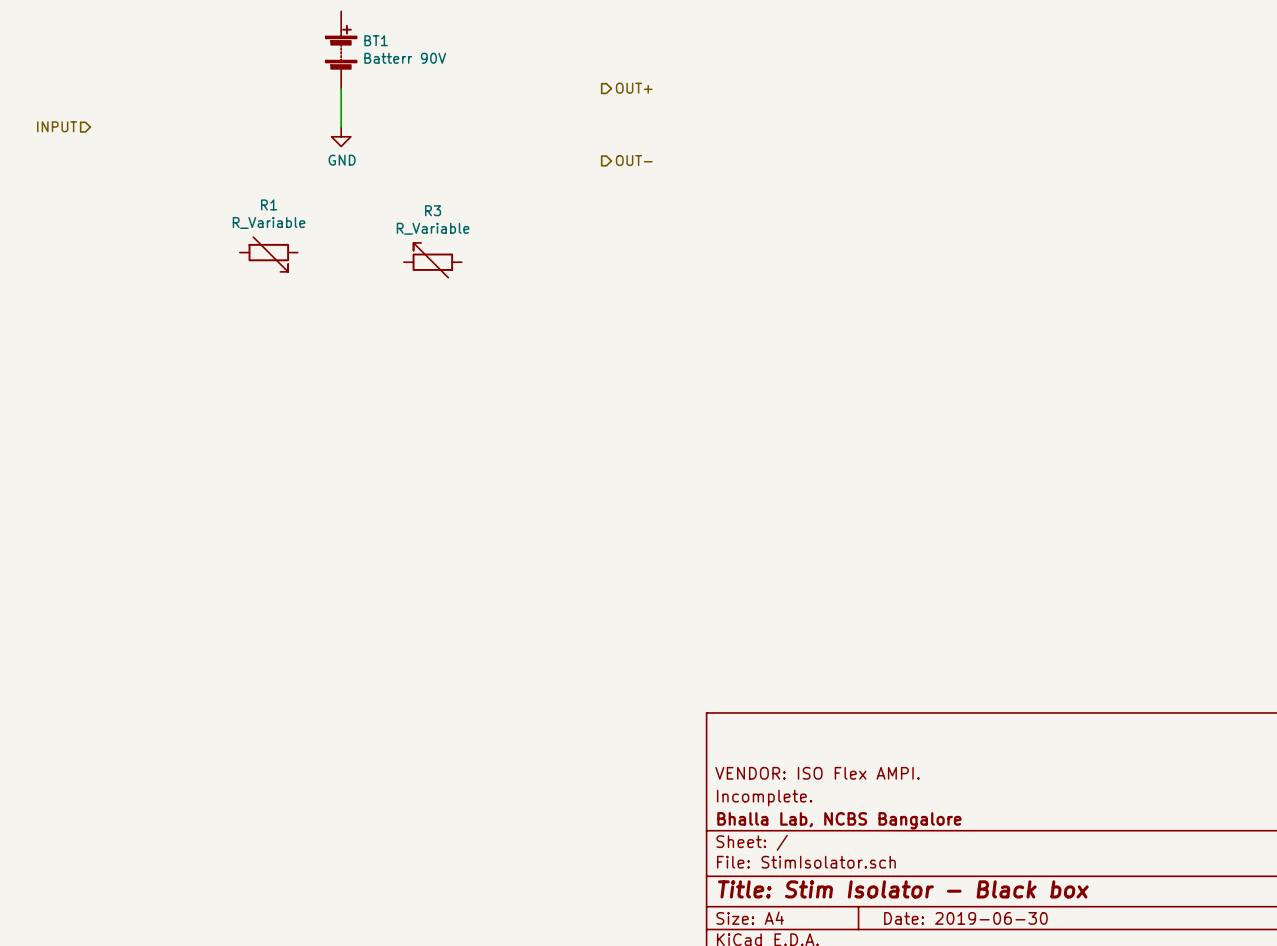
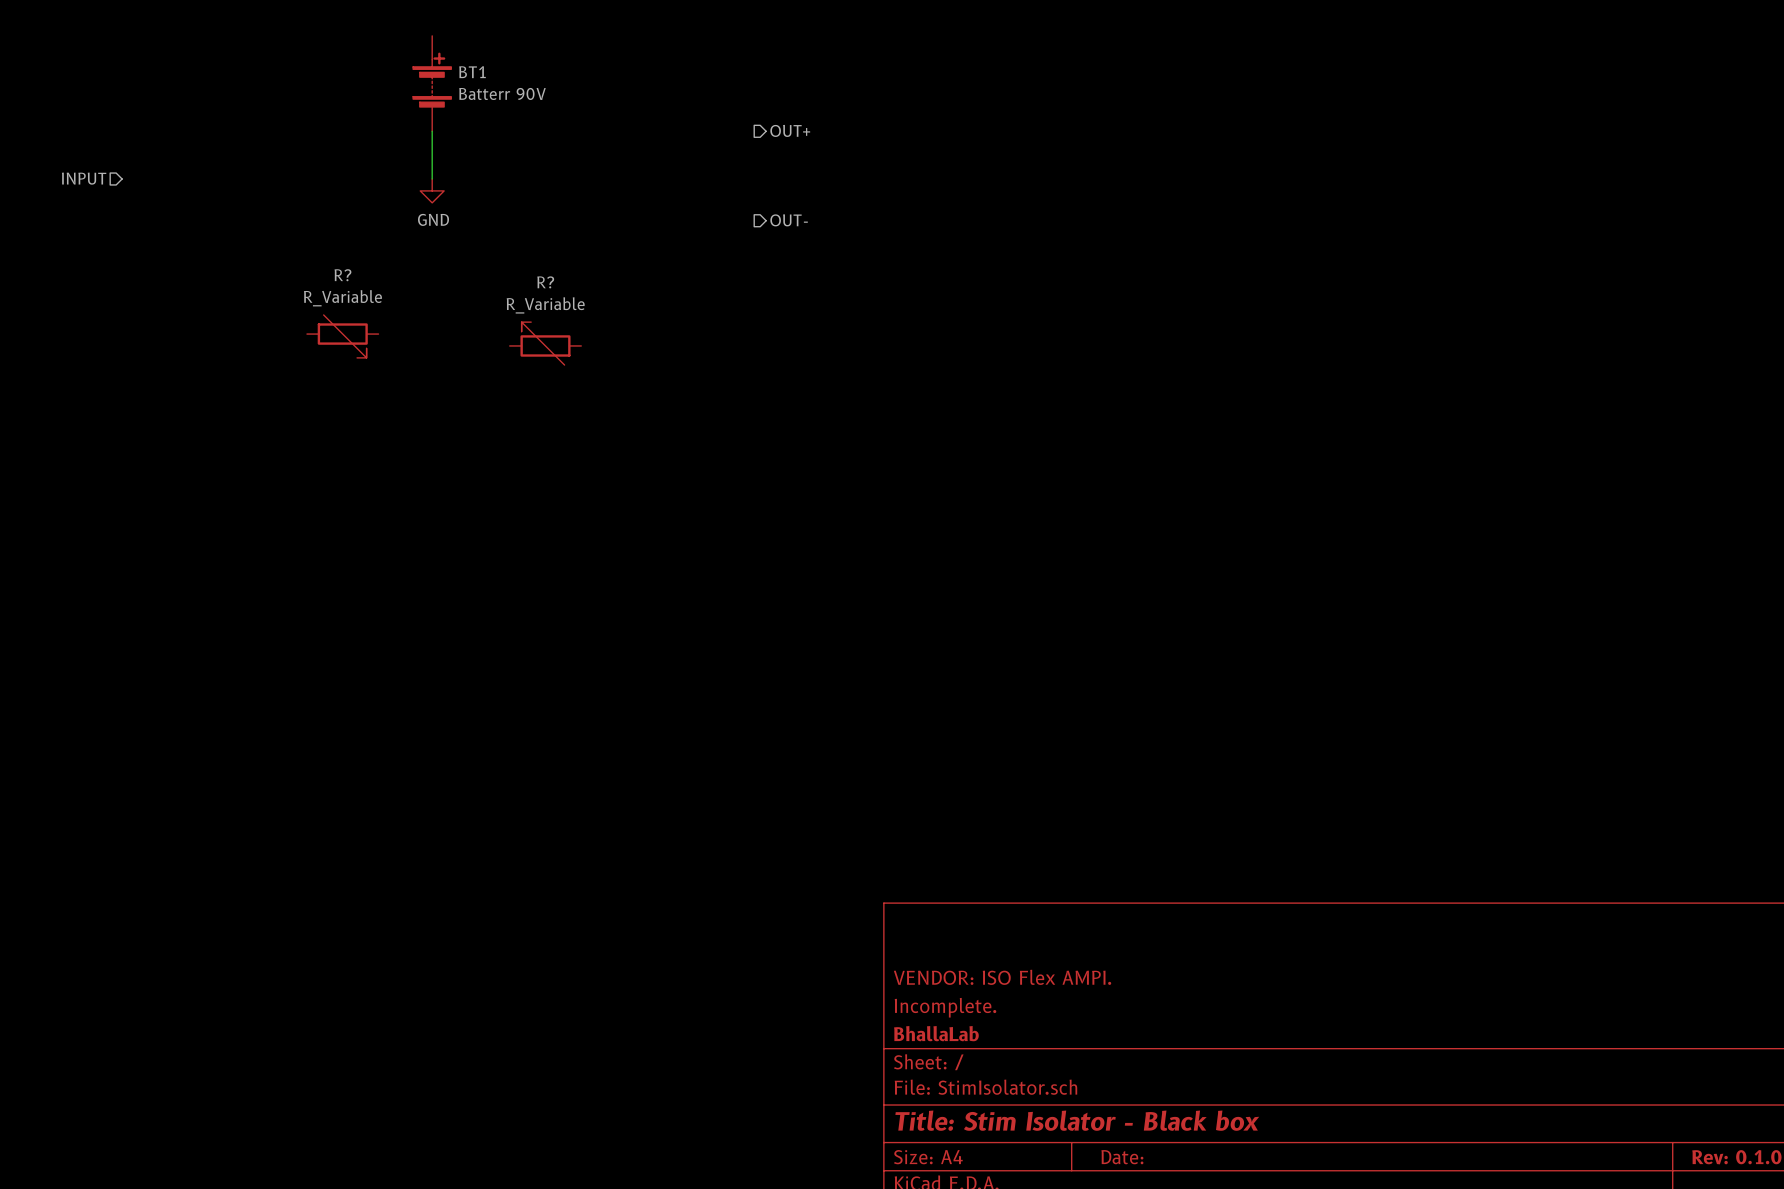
R1 name: R1 (269, 204) -> R? (342, 275)
R3 name: R3 (433, 210) -> R? (545, 282)
title block: Bhalla Lab, NCBS Bangalore (839, 820) -> BhallaLab (936, 1033)
title block: Date: 2019-06-30 (965, 918) -> Date: (1122, 1157)

